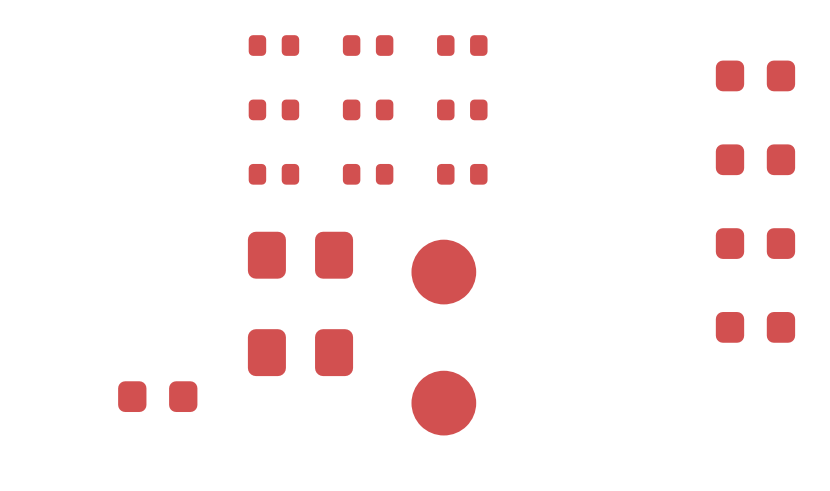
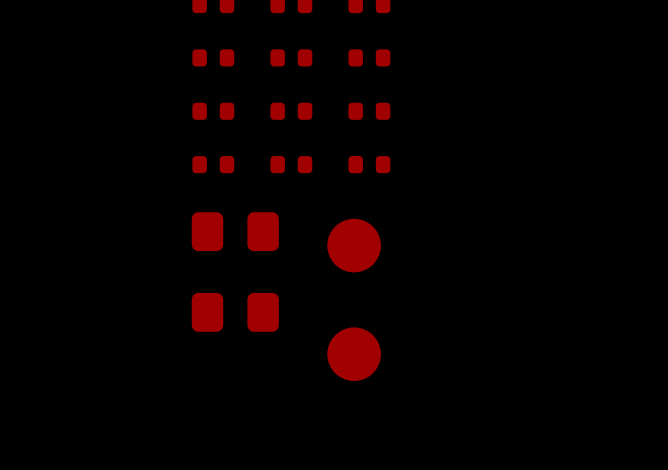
part: (755, 75) -> none
part: (755, 159) -> none
part: (755, 243) -> none
part: (755, 327) -> none
part: (157, 396) -> none

